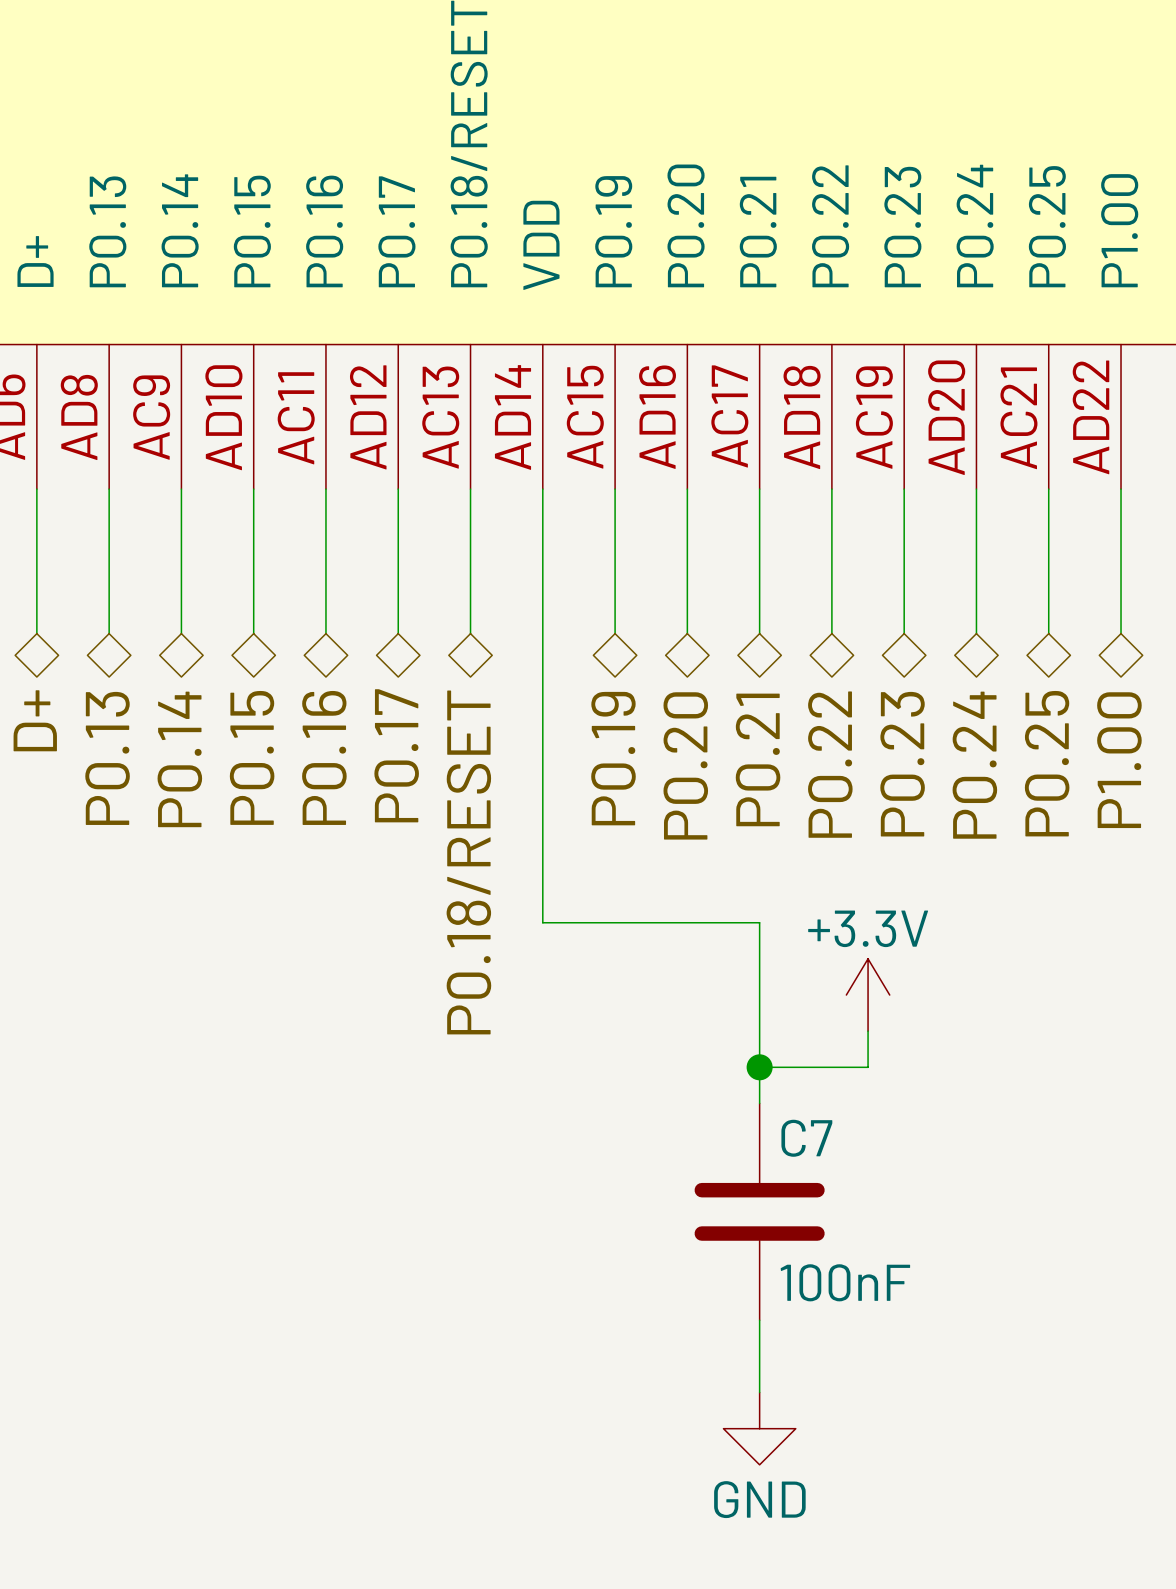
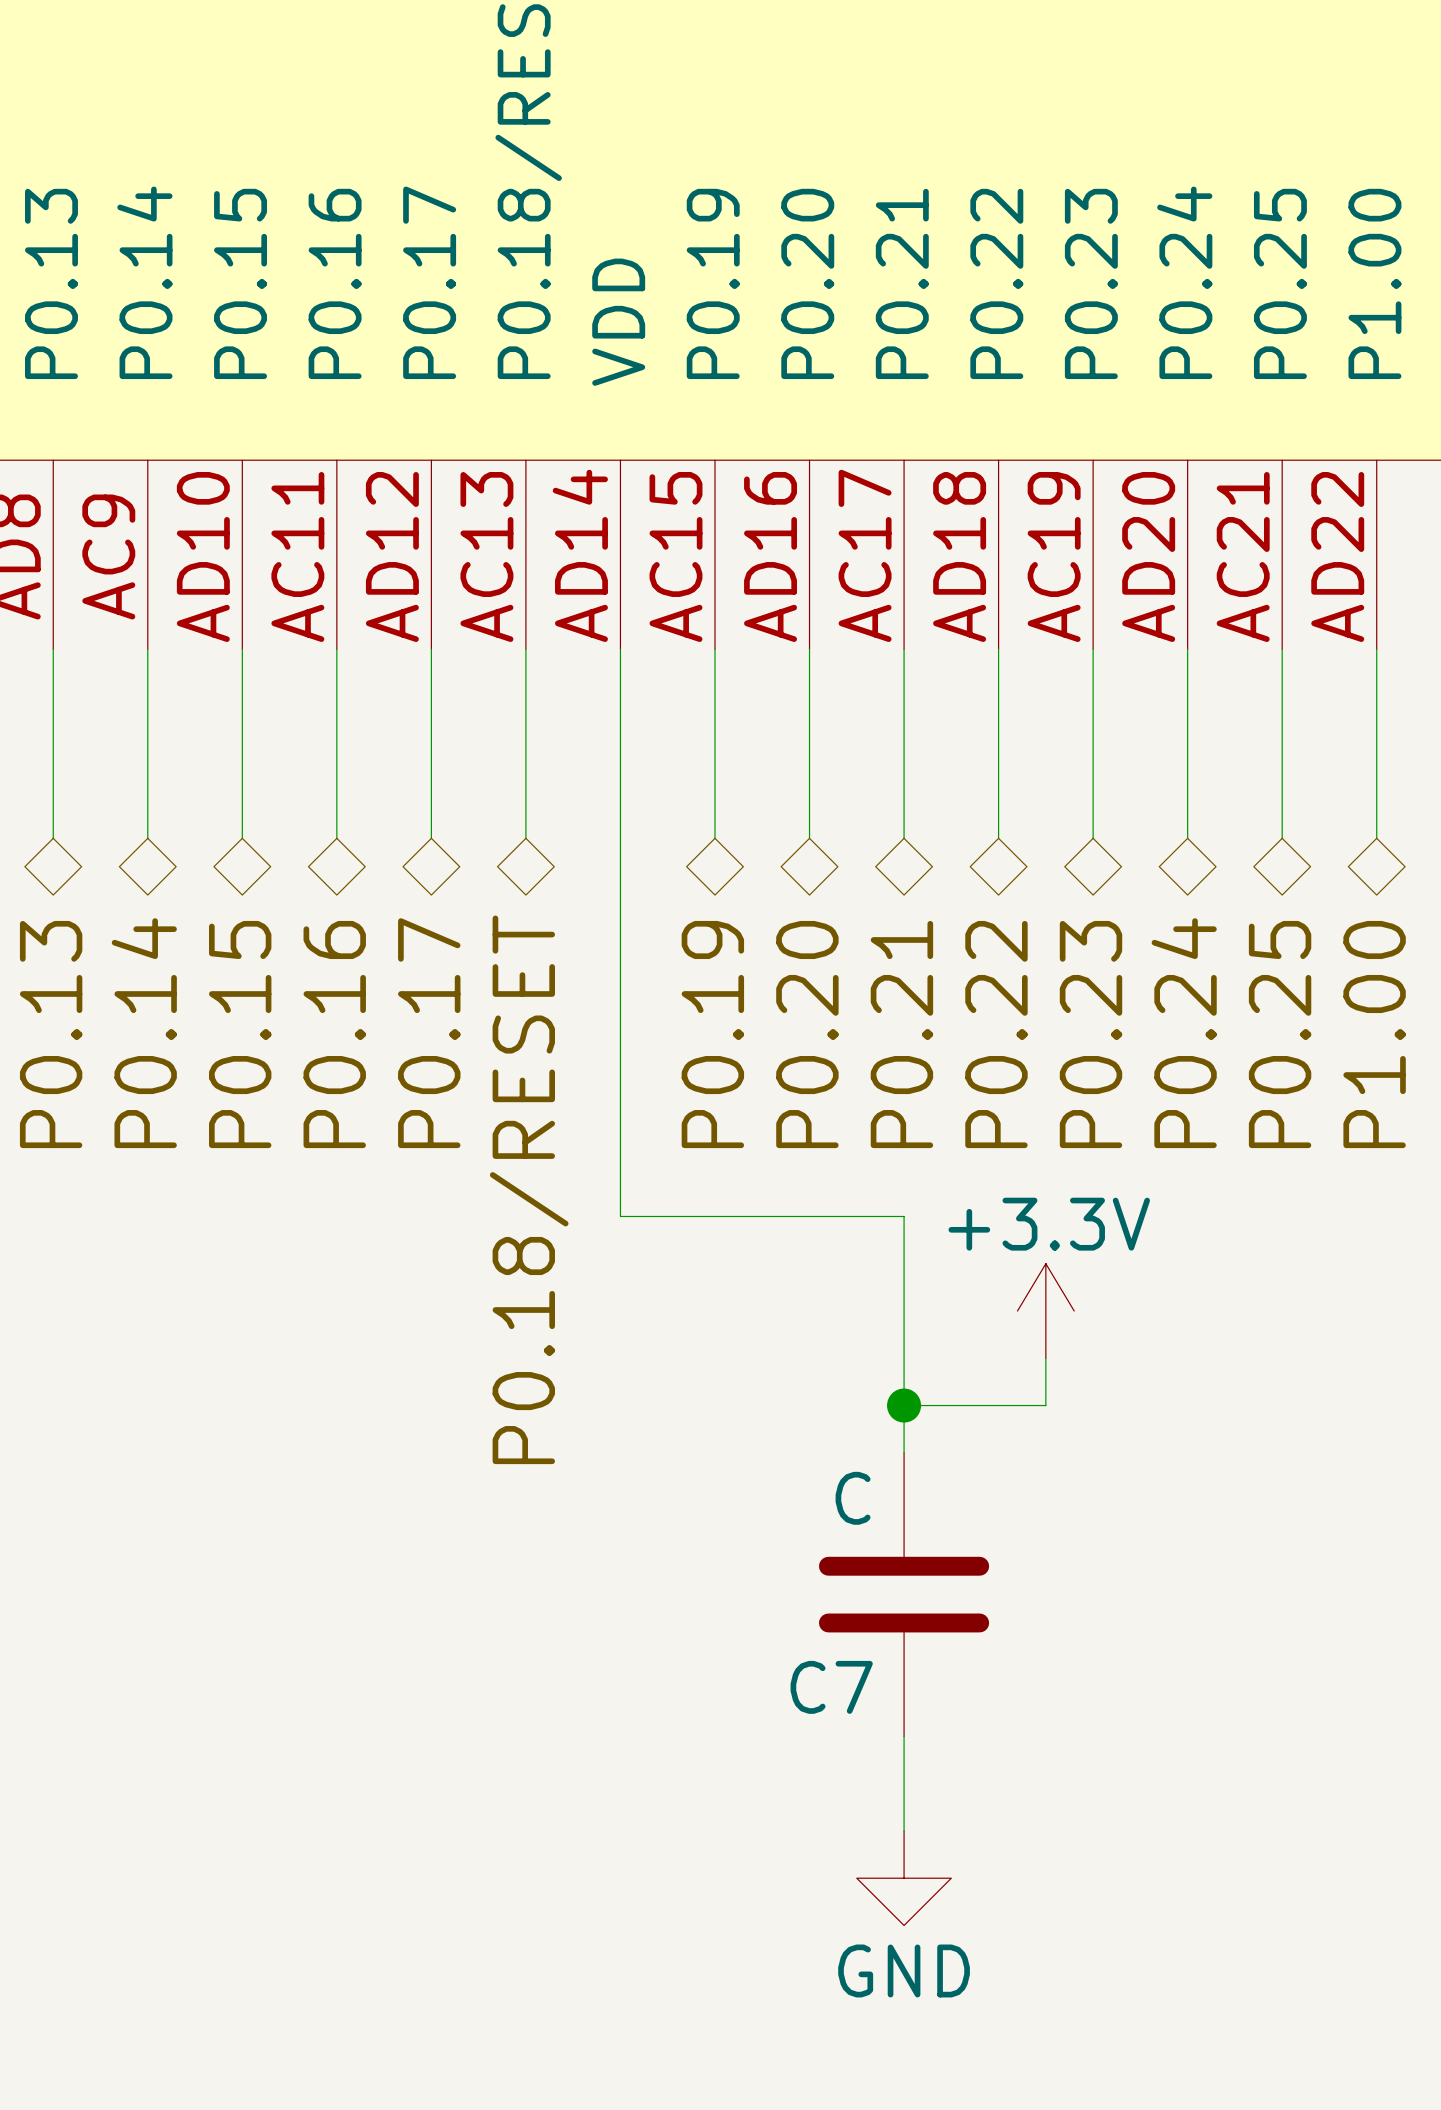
C7 name position: C7 (806, 1138) -> C7 (831, 1687)
C7 value: 100nF (845, 1282) -> C (853, 1498)

